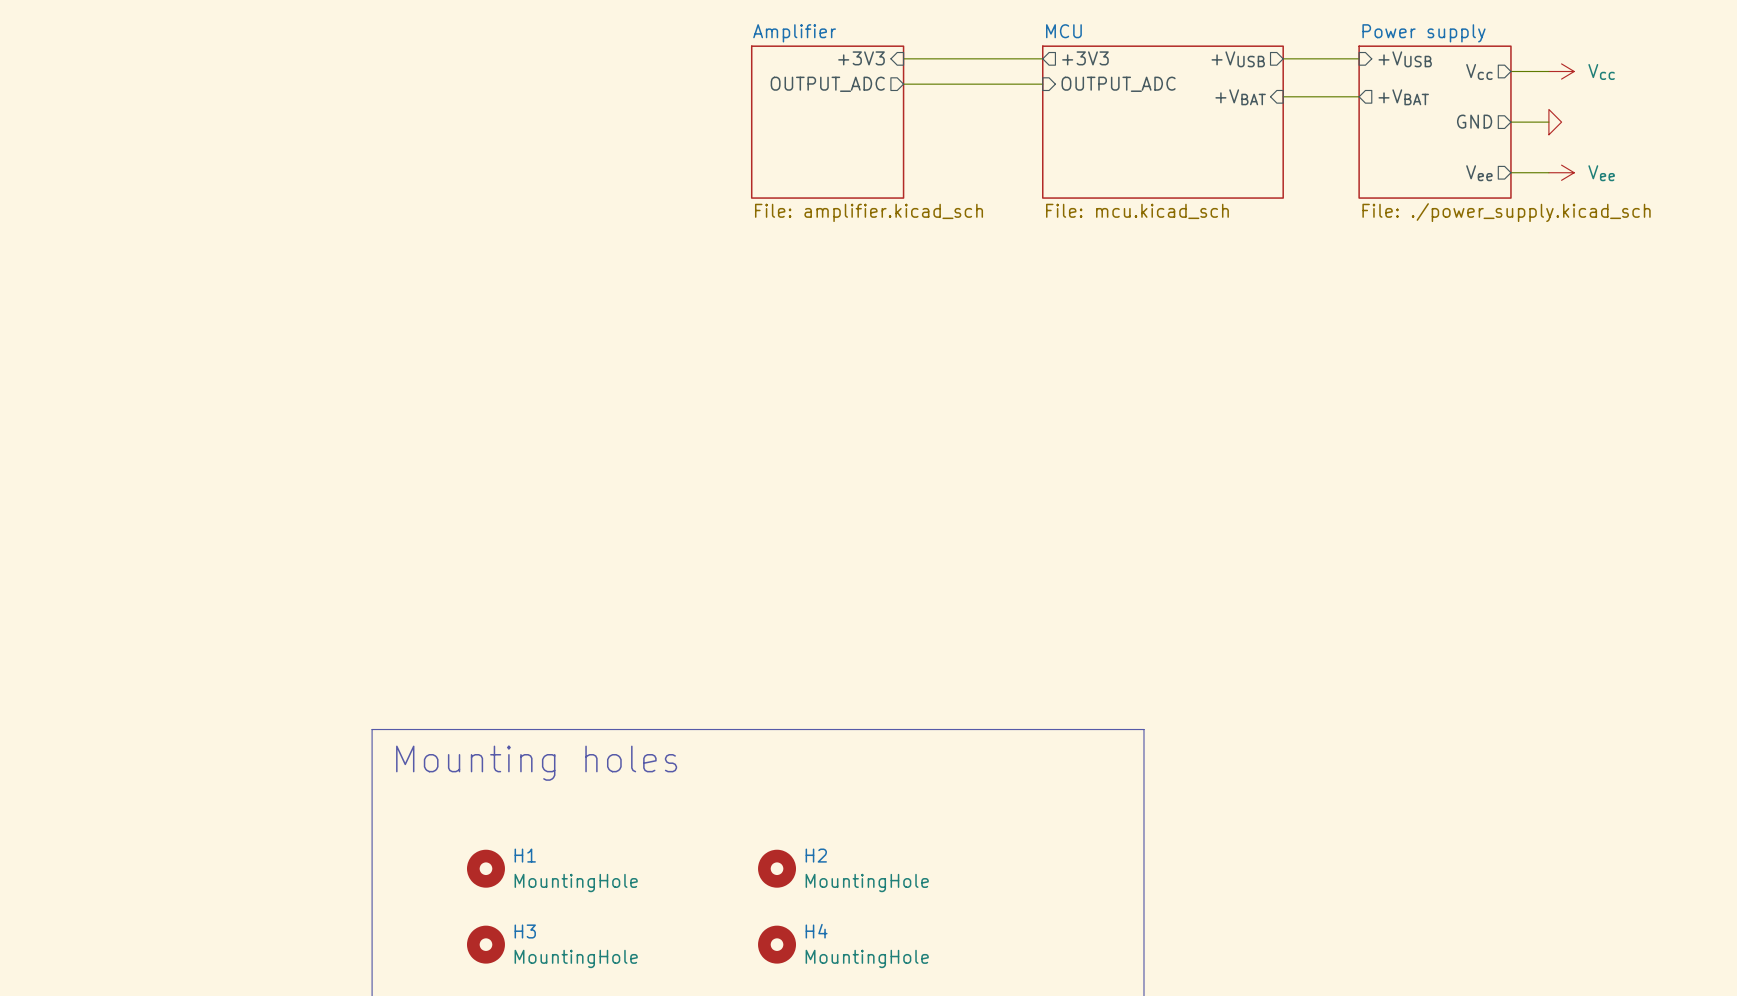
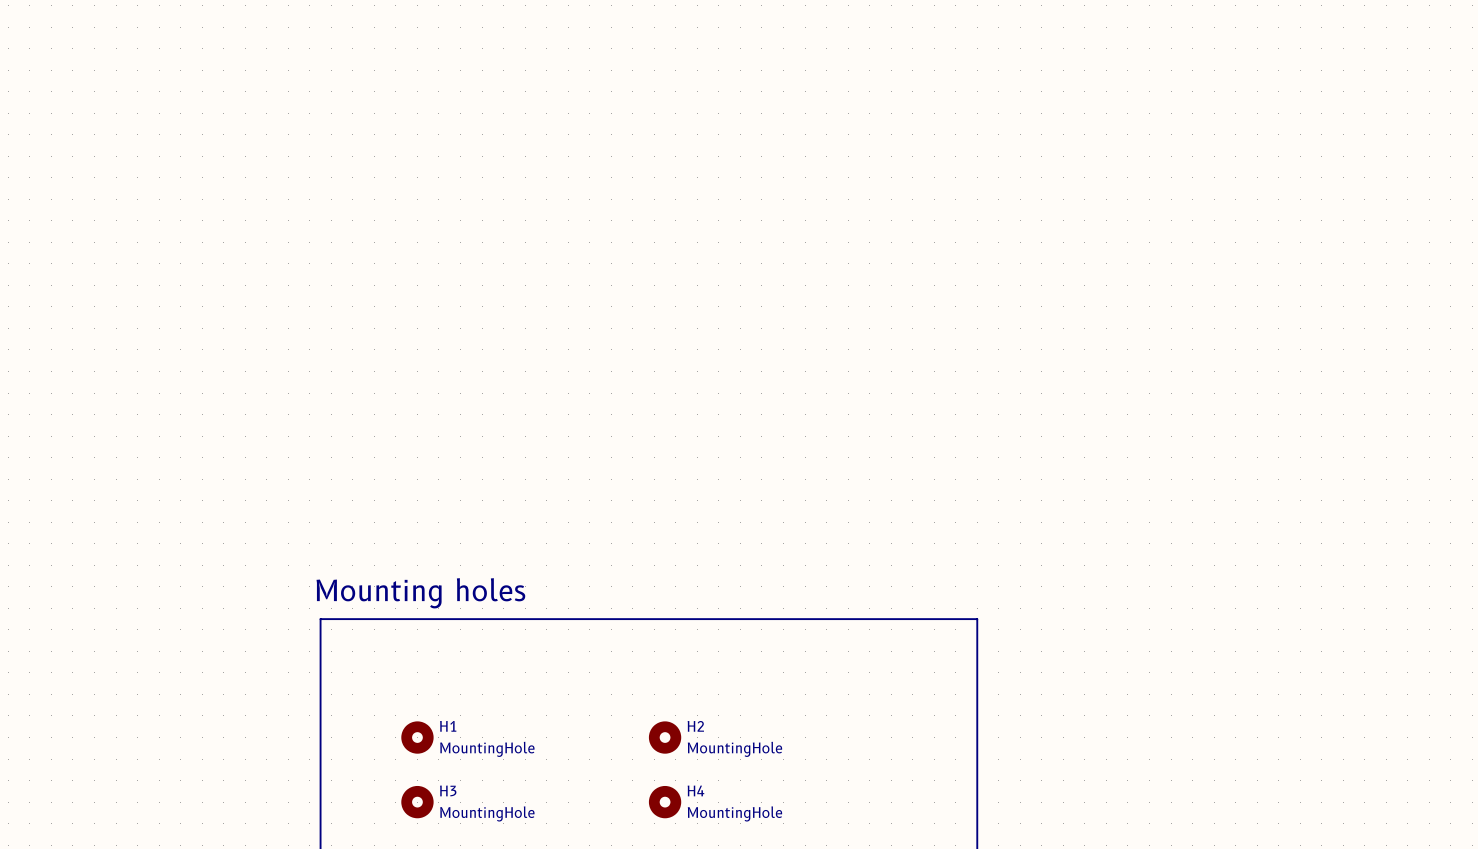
sheet pin: +3V3 (861, 58) -> none
wire: (903, 58) (1042, 58) -> none
sheet pin: +3V3 (1085, 58) -> none
wire: (1283, 58) (1359, 58) -> none
sheet pin: +VUSB (1238, 59) -> none
sheet pin: +VUSB (1405, 59) -> none
sheet pin: Vcc (1479, 71) -> none
wire: (1510, 71) (1548, 71) -> none
power symbol: Vcc (1561, 71) -> none
sheet pin: OUTPUT_ADC (827, 84) -> none
wire: (903, 84) (1042, 84) -> none
sheet pin: OUTPUT_ADC (1118, 84) -> none
wire: (1283, 96) (1359, 96) -> none
sheet pin: +VBAT (1240, 97) -> none
sheet pin: +VBAT (1403, 97) -> none
sheet pin: GND (1474, 121) -> none
sheet Amplifier: File: amplifier.kicad_sch (827, 122) -> none
sheet MCU: File: mcu.kicad_sch (1162, 122) -> none
sheet Power supply: File: ./power_supply.kicad_sch (1435, 122) -> none
wire: (1510, 122) (1548, 122) -> none
power symbol: (1555, 122) -> none
wire: (1510, 172) (1548, 172) -> none
power symbol: Vee (1561, 172) -> none
sheet pin: Vee (1479, 173) -> none
text position: Mounting holes (536, 763) -> Mounting holes (420, 593)

